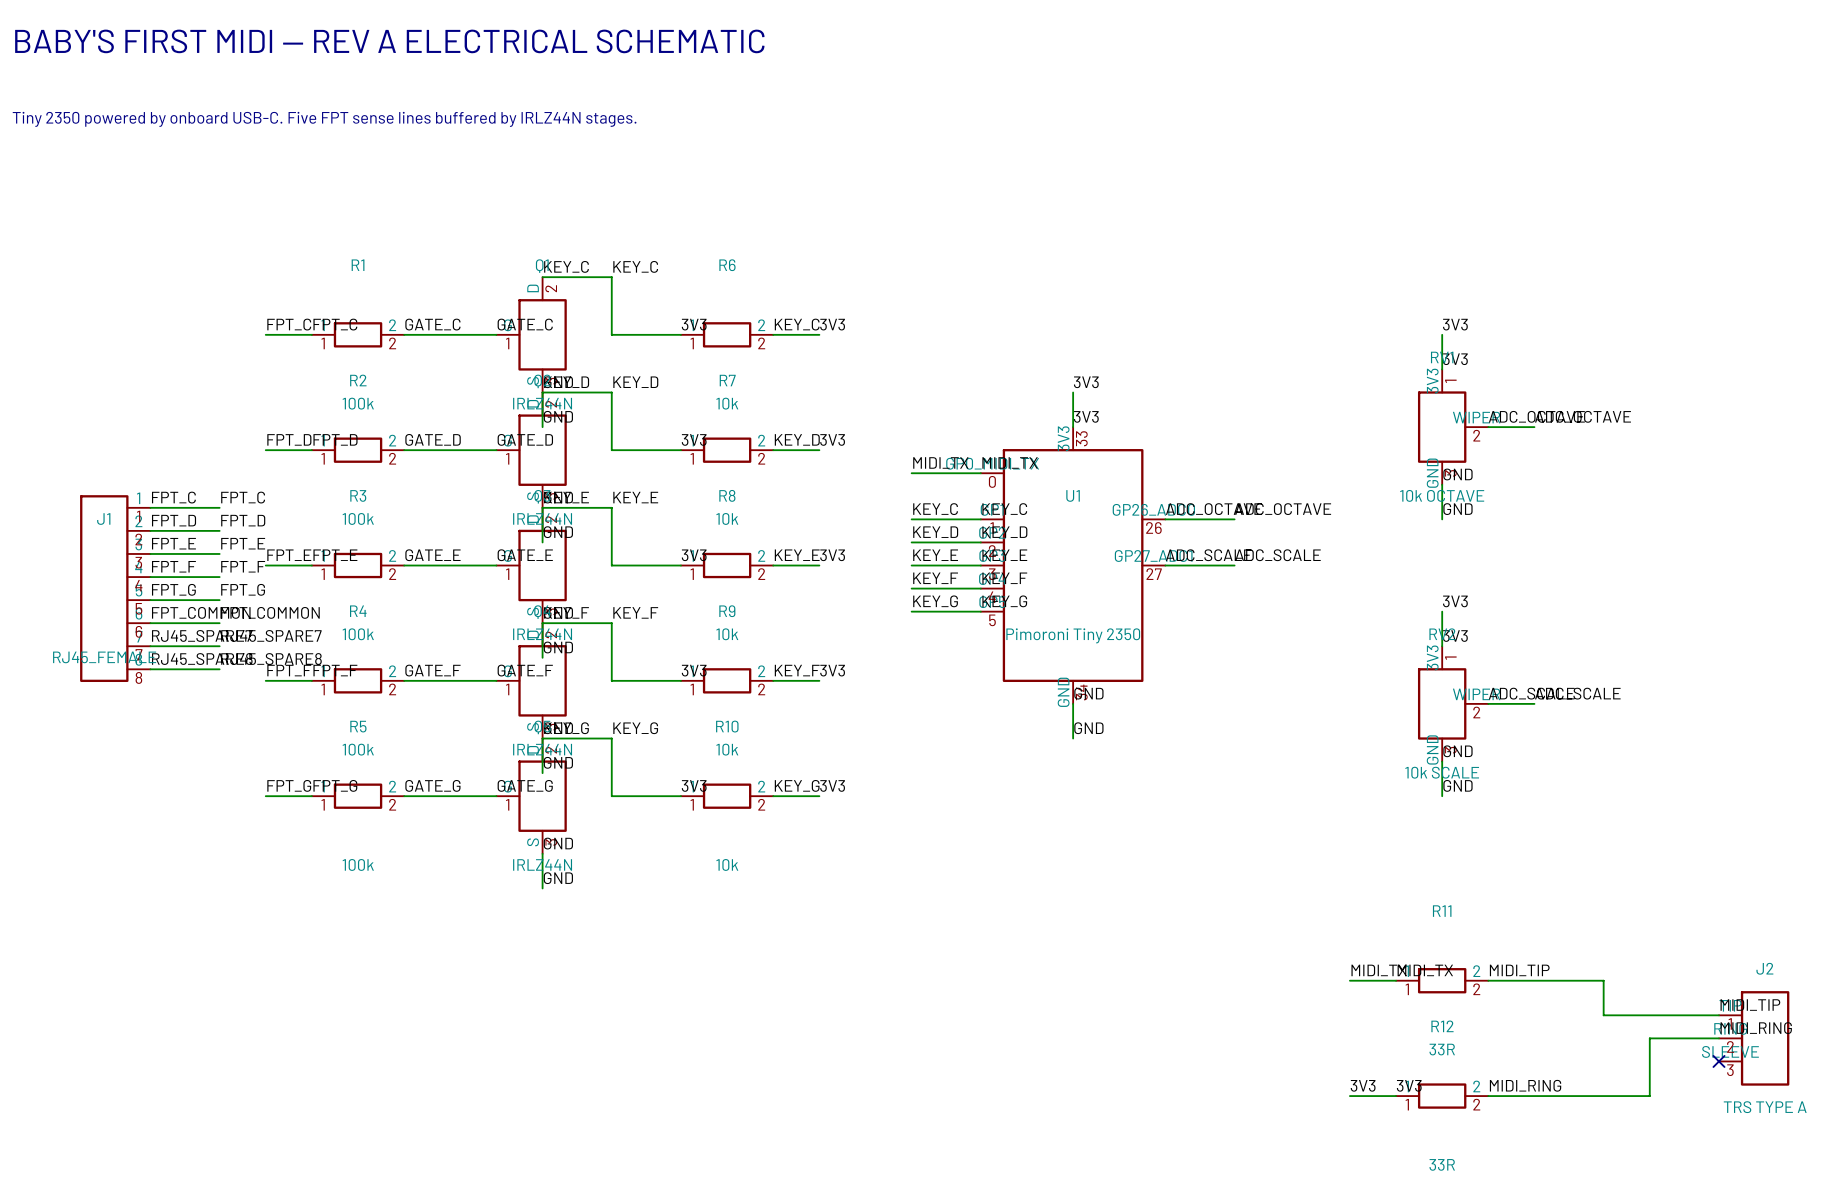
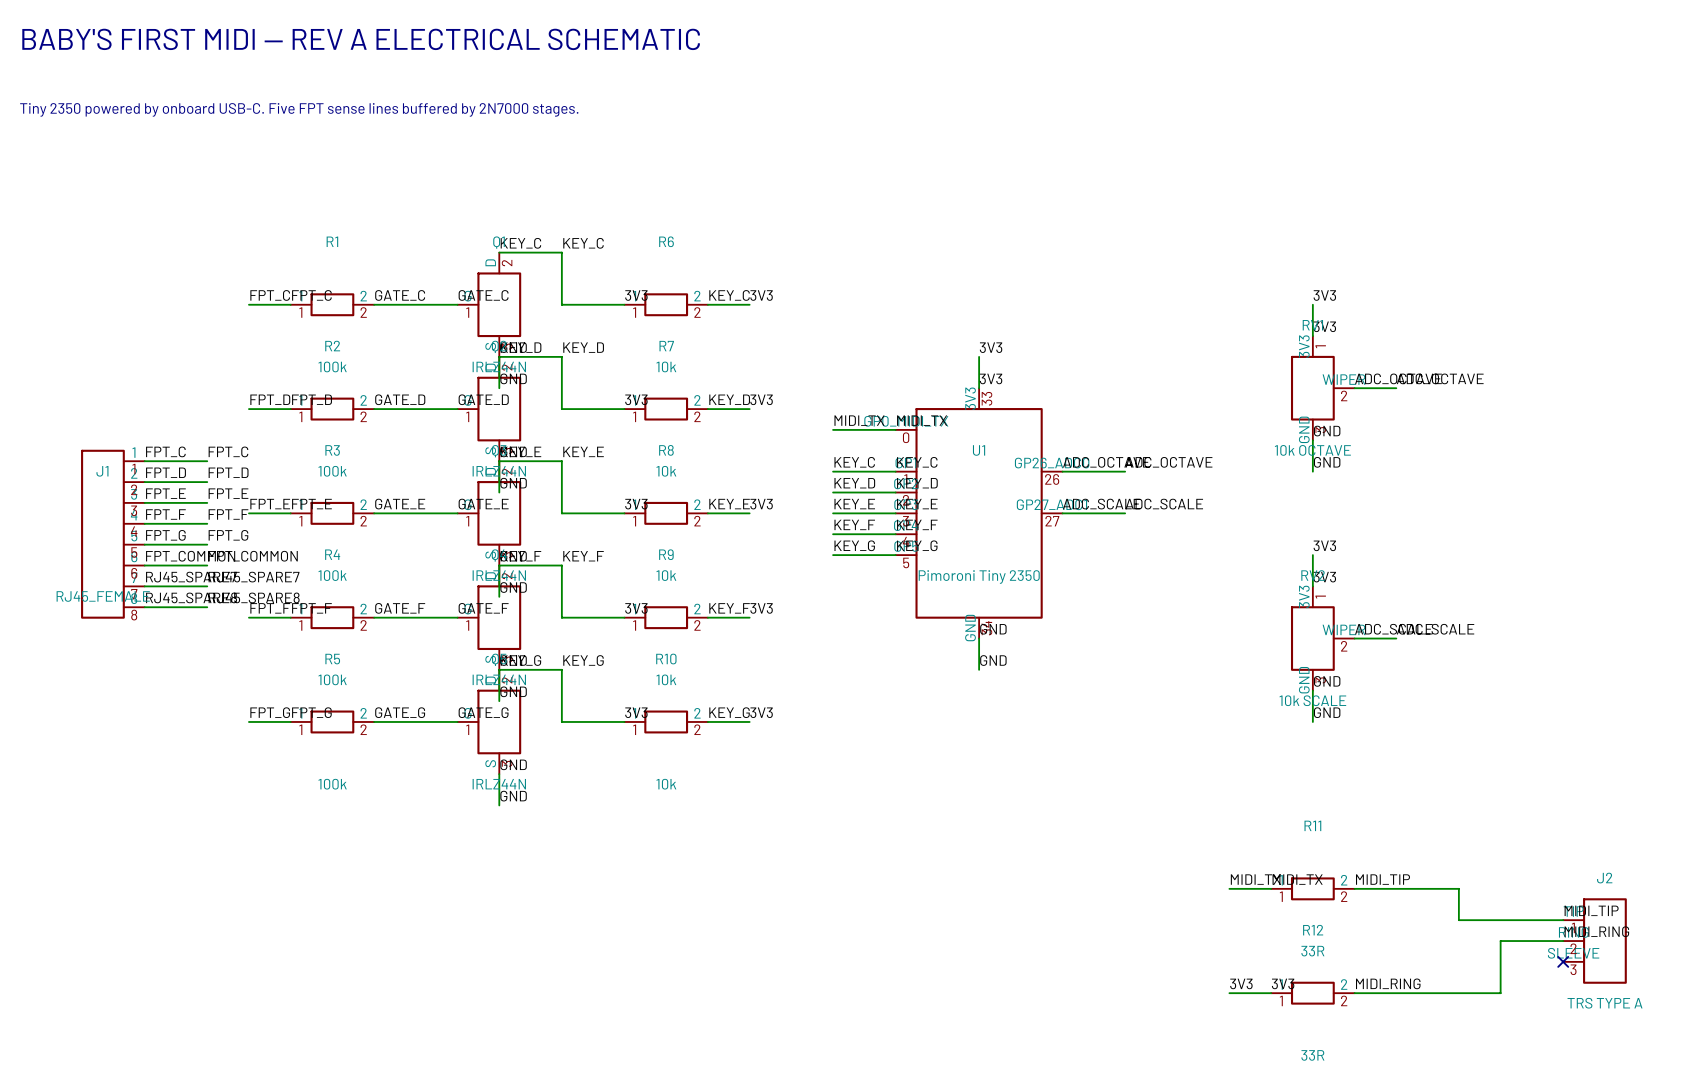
text: Tiny 2350 powered by onboard USB-C. Five FPT sense lines buffered by IRLZ44N stages. (324, 119) -> Tiny 2350 powered by onboard USB-C. Five FPT sense lines buffered by 2N7000 stages. (299, 109)

